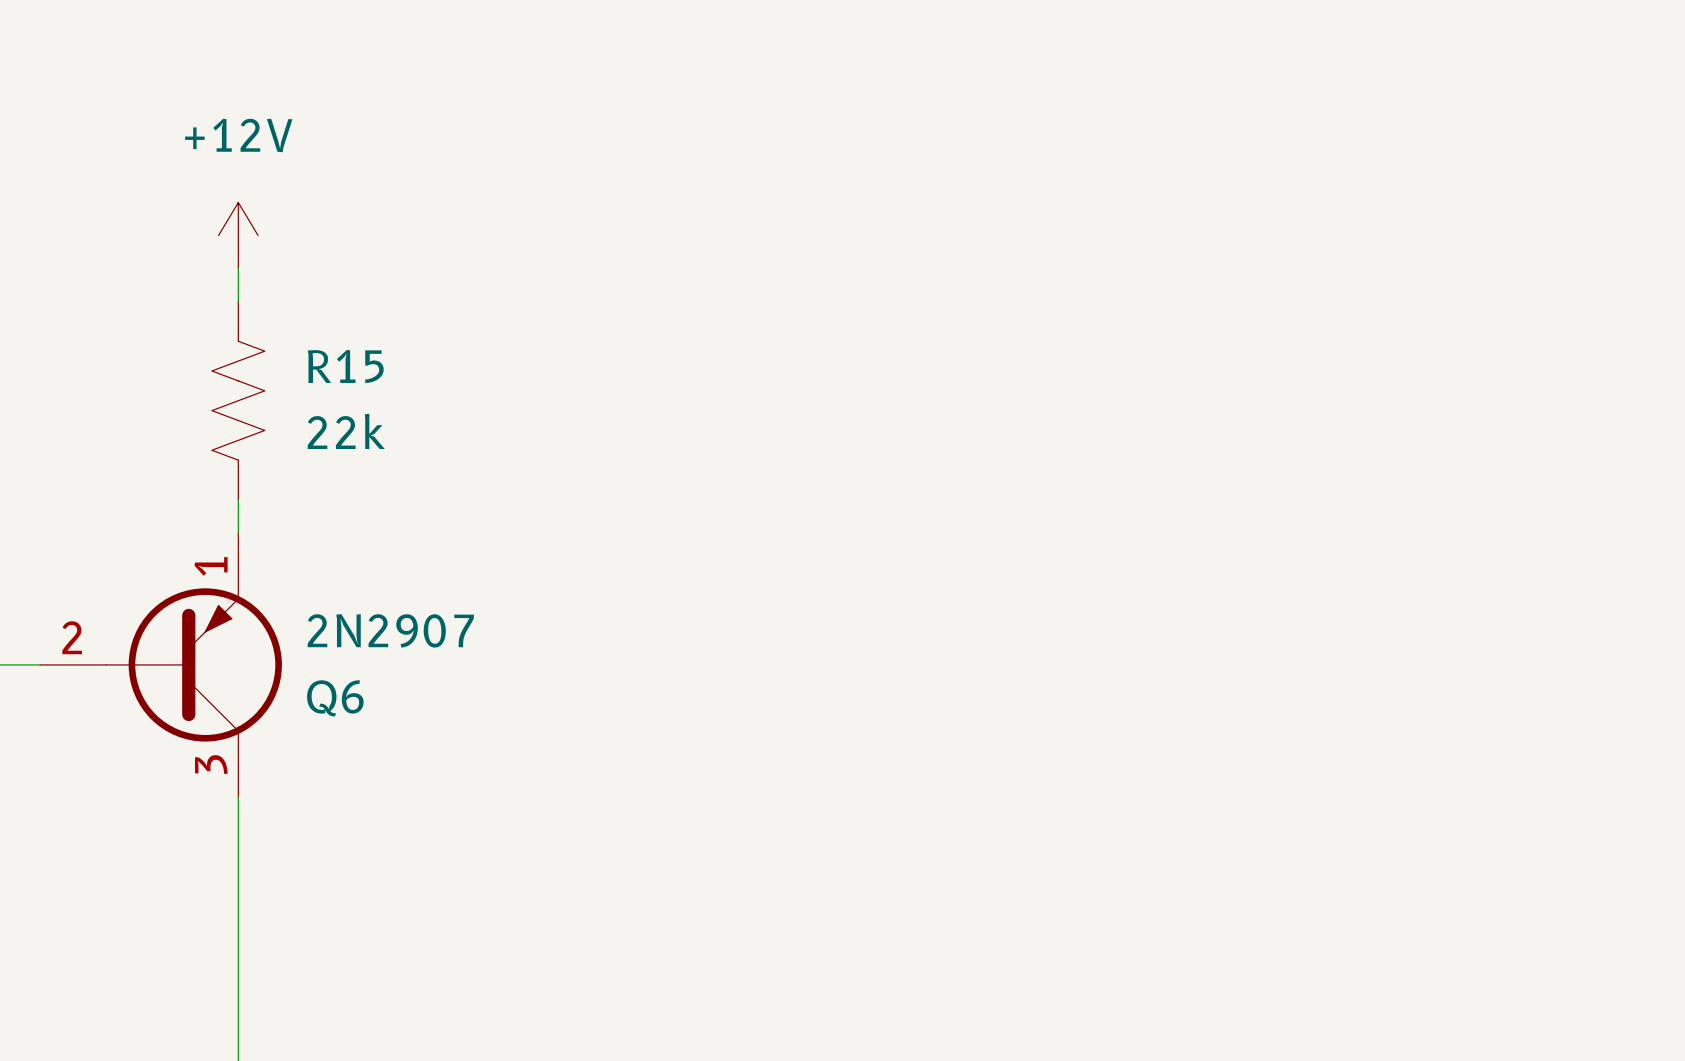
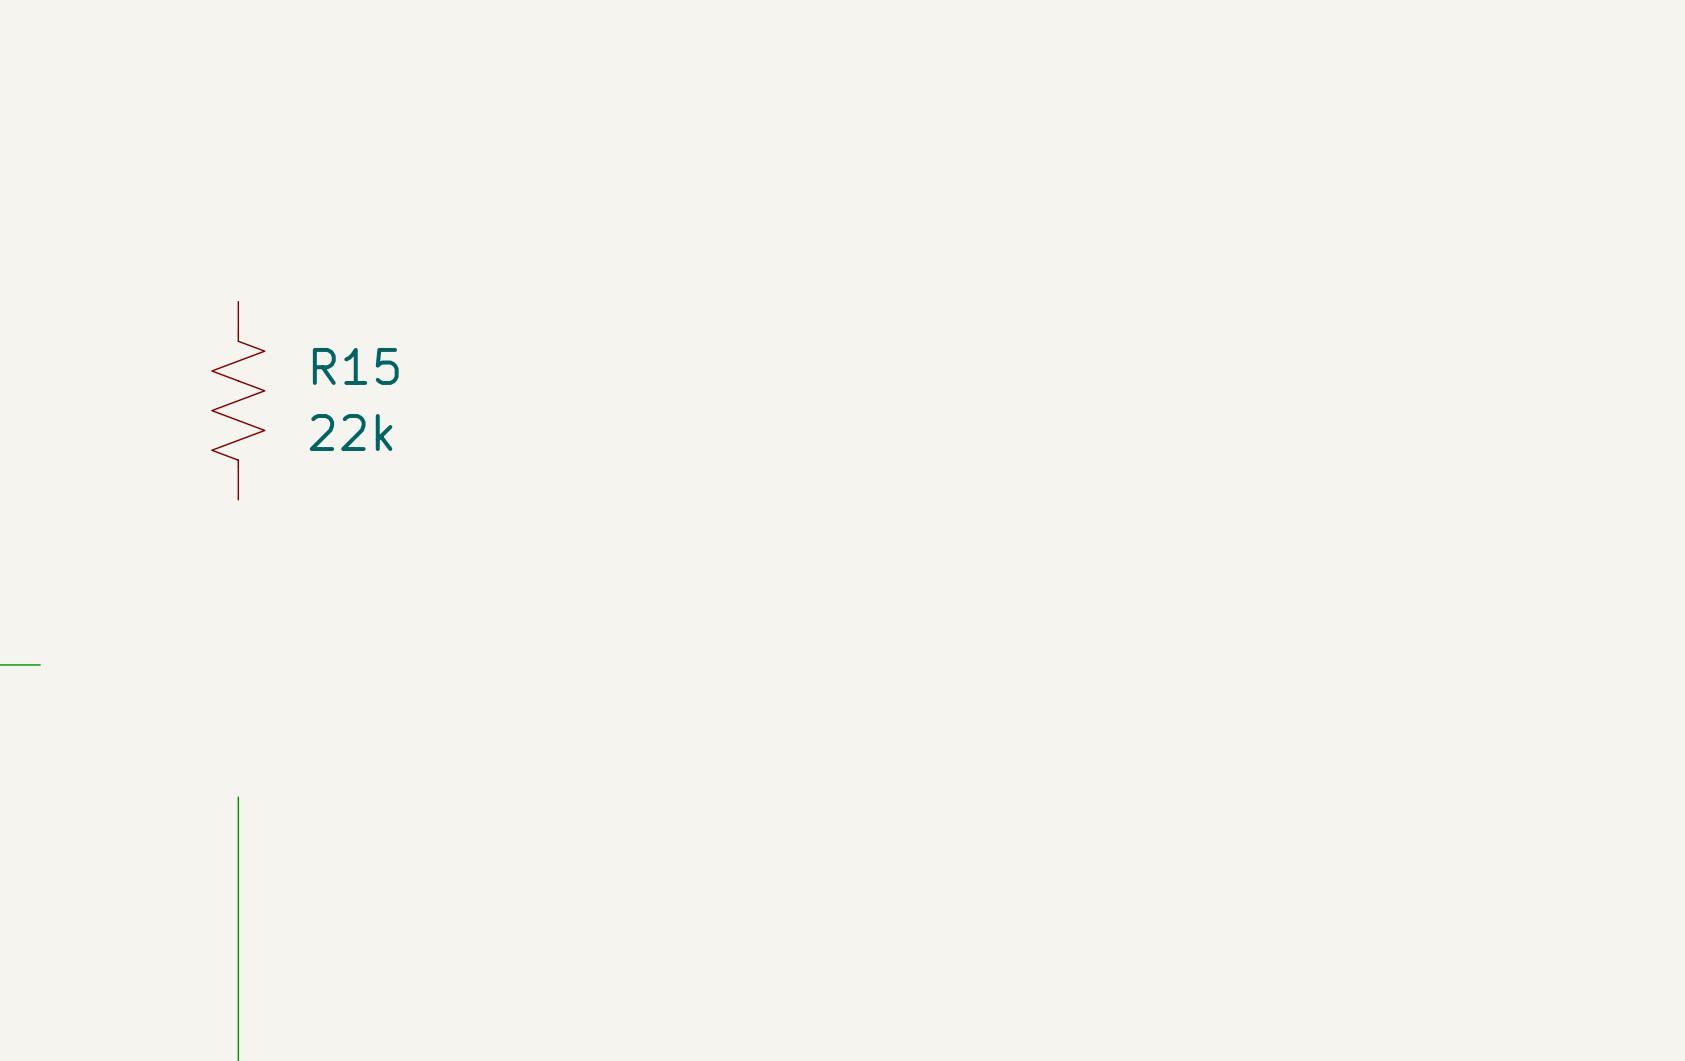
power symbol: +12V (238, 235) -> none
wire: (238, 268) (238, 301) -> none
wire: (238, 499) (238, 532) -> none
Q6: 2N2907 (161, 664) -> none

